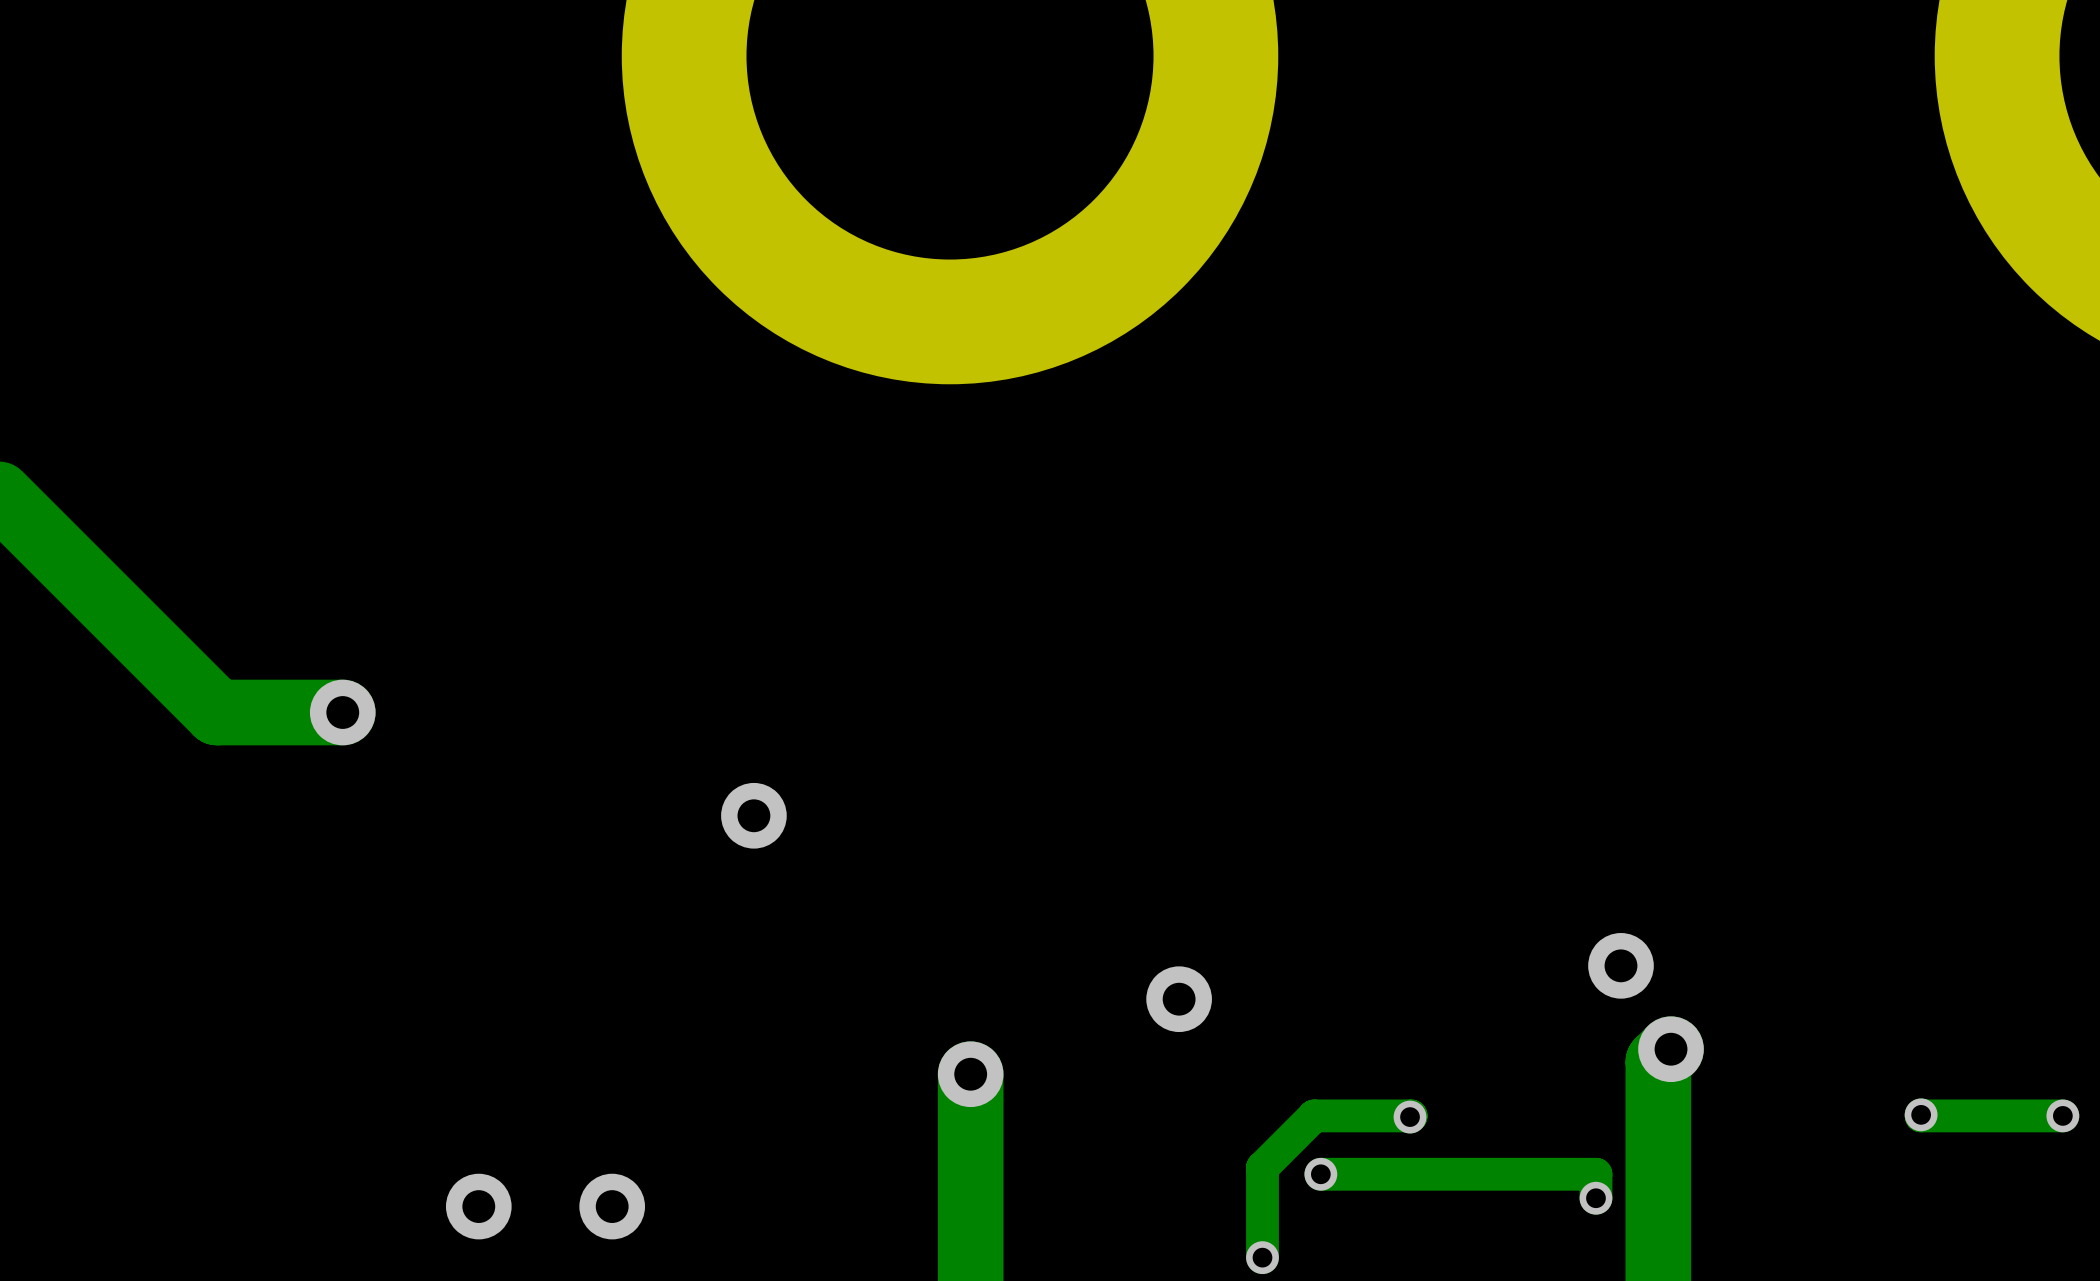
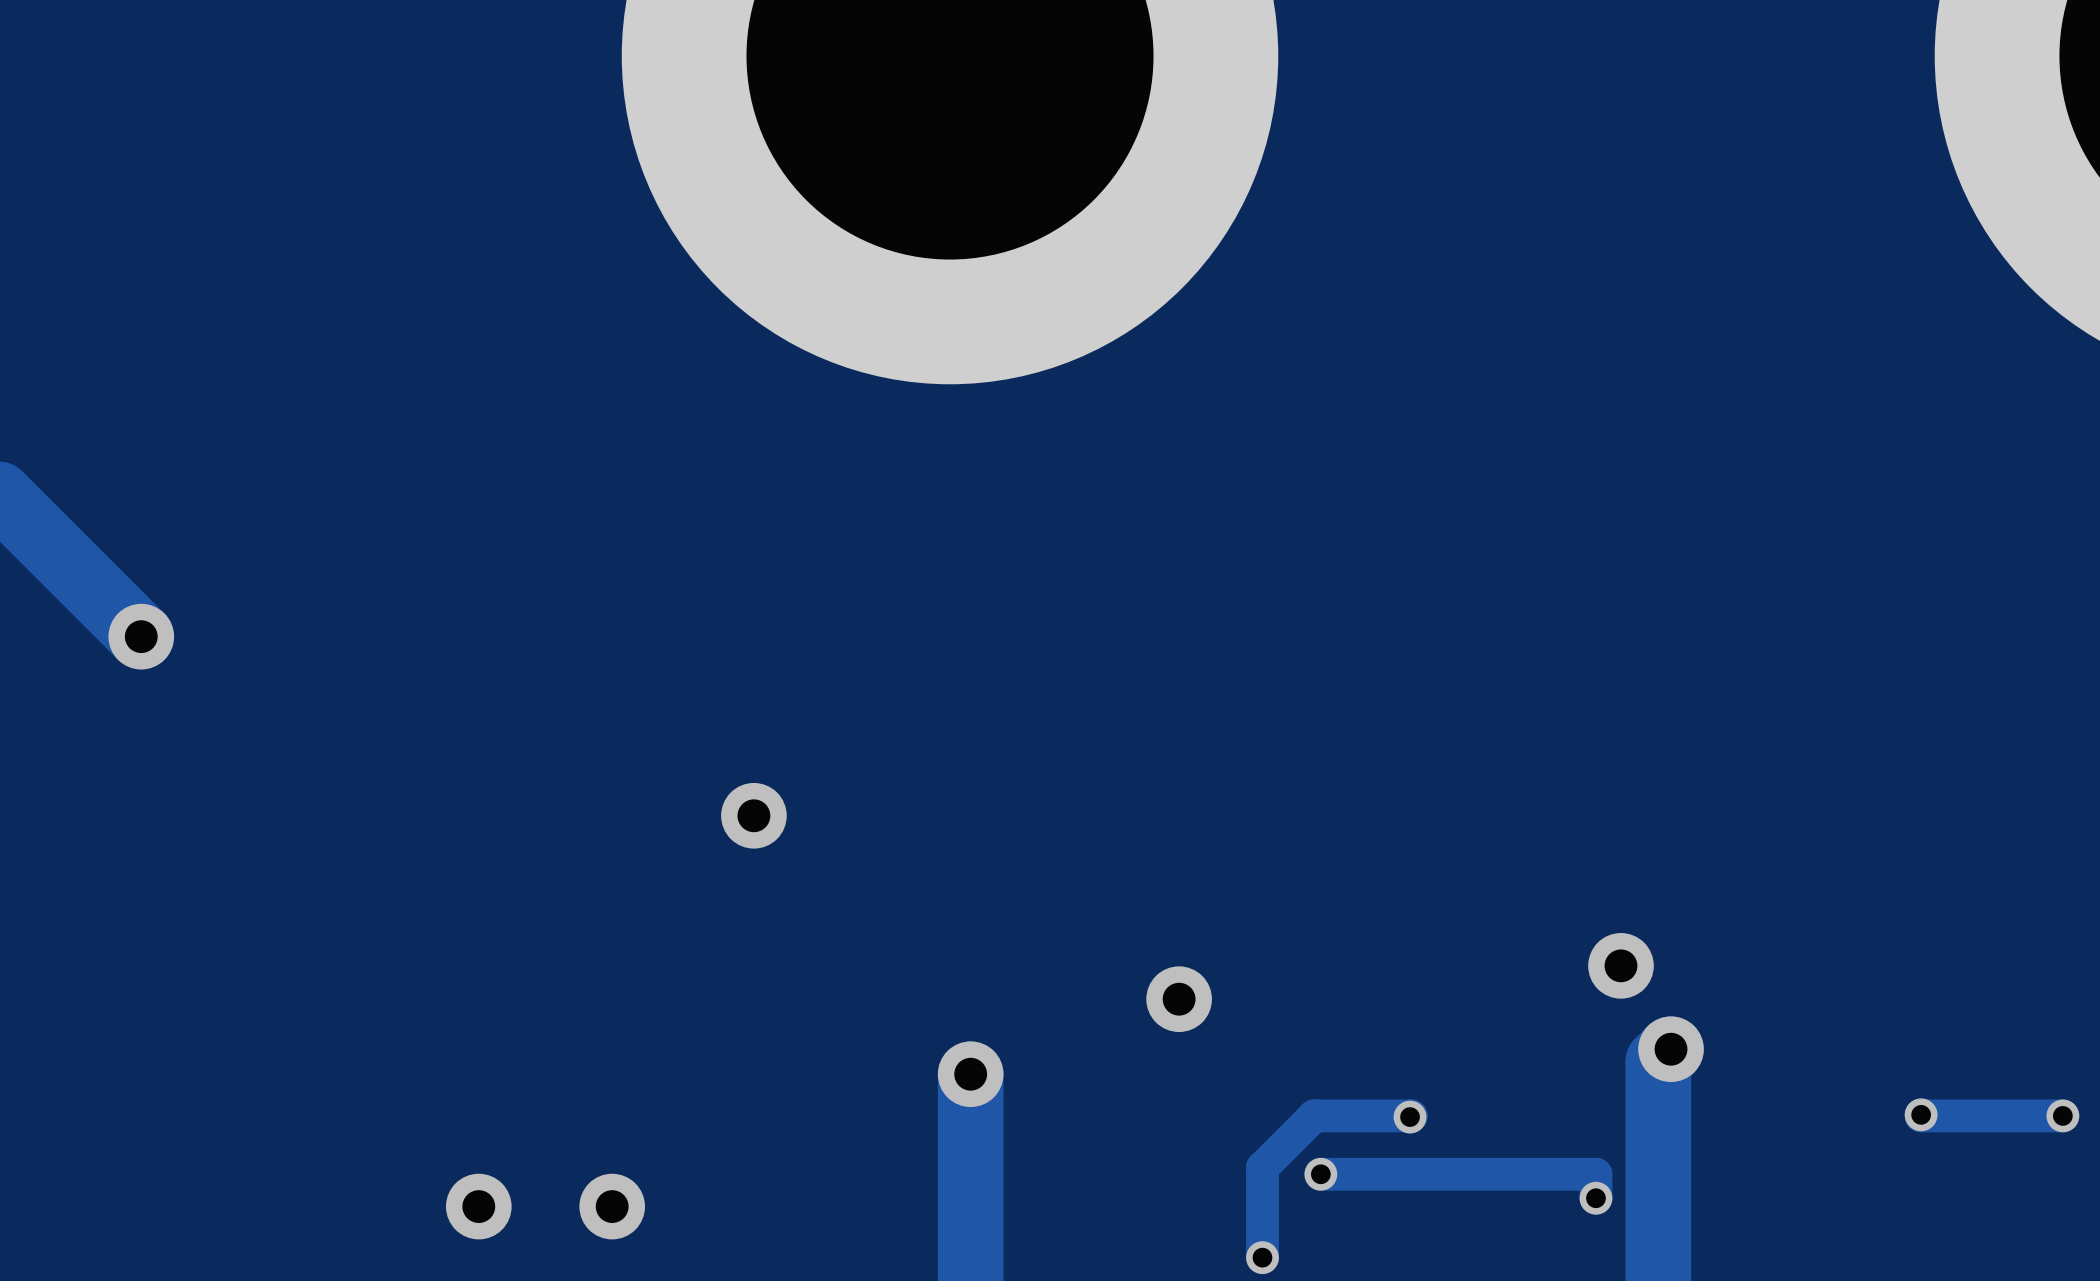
track: (141, 636) (217, 712) (342, 712) -> none
via position: (342, 712) -> (141, 636)

